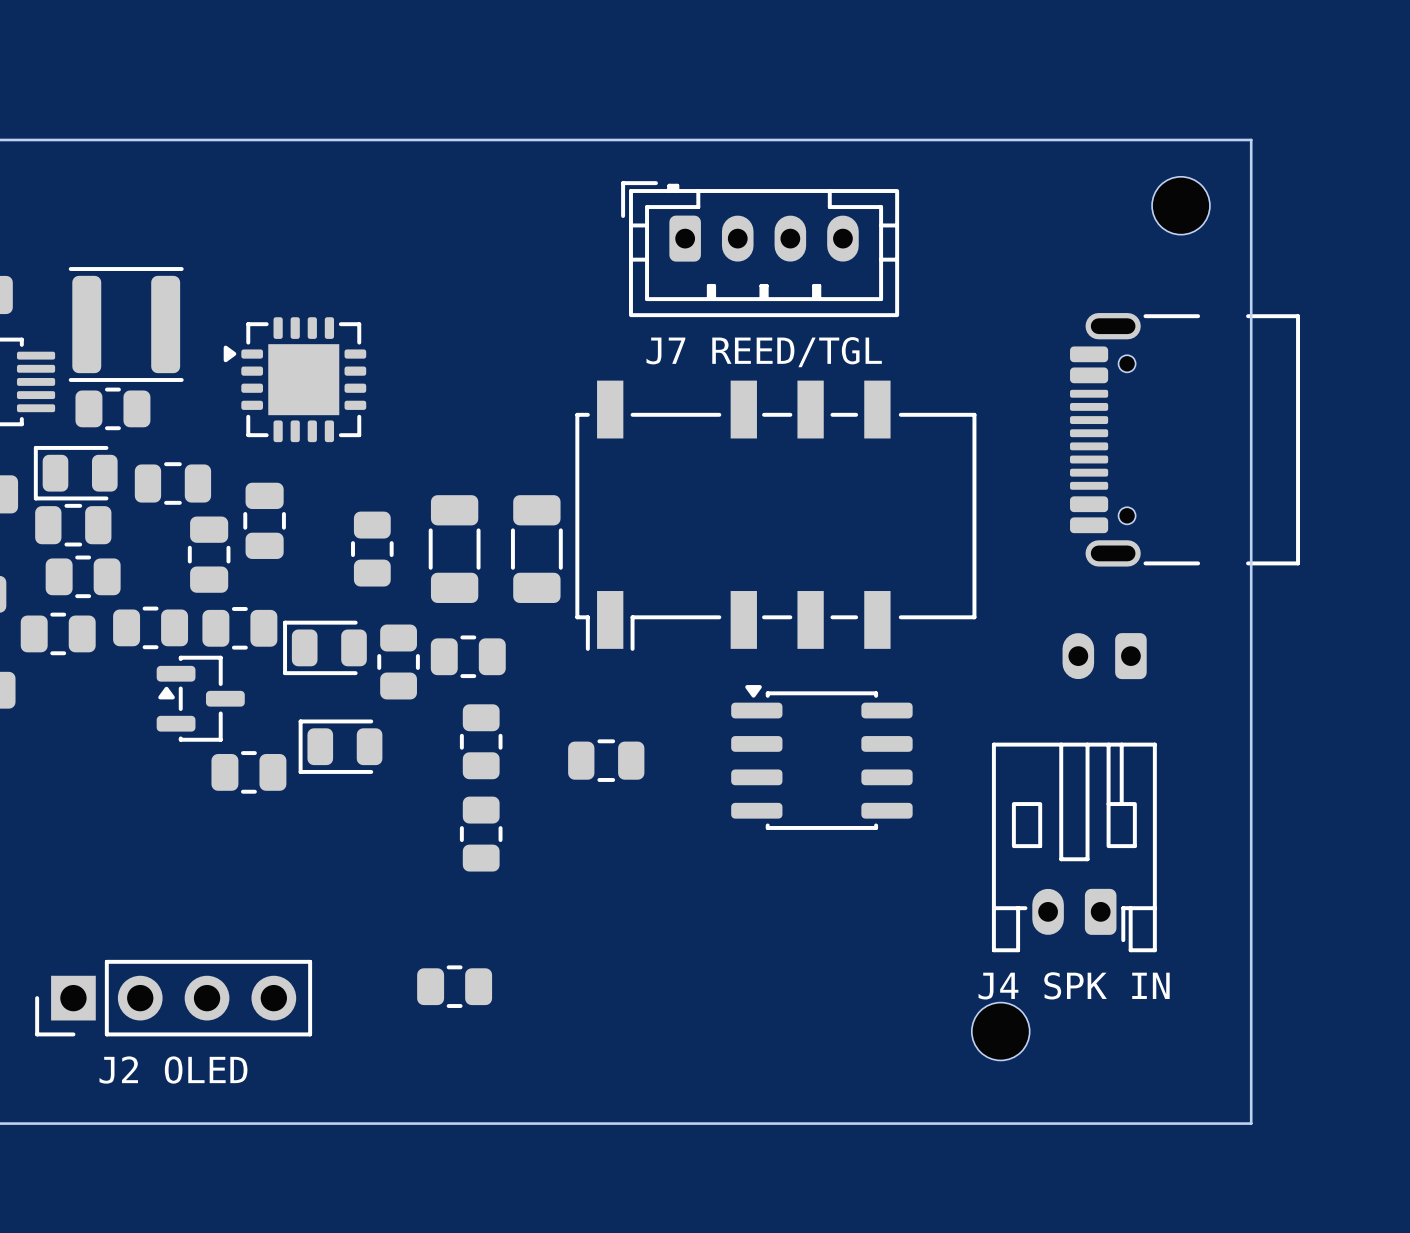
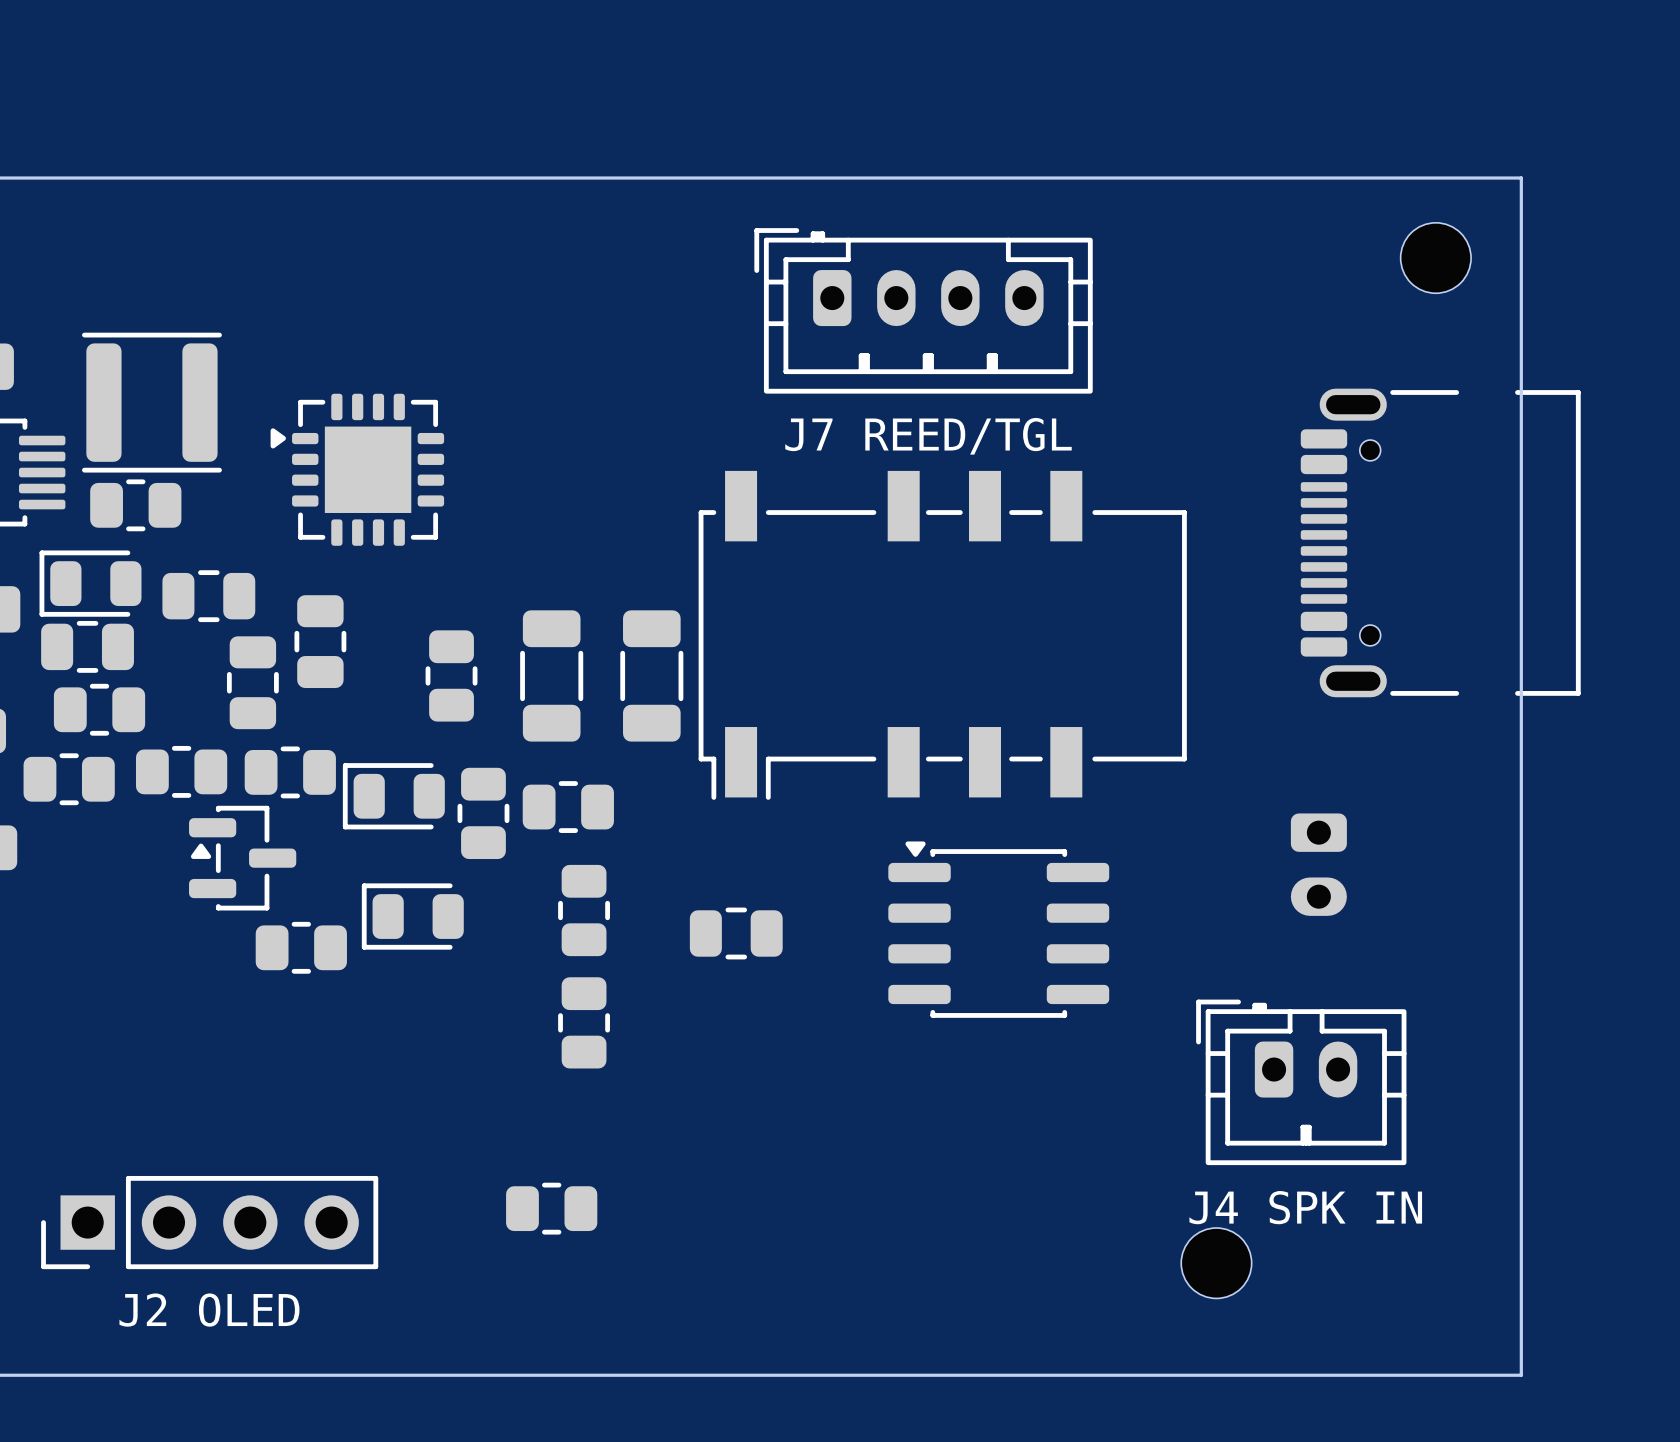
part rotation: 0° (1104, 656) -> 90° counterclockwise (1318, 864)
part position: (1104, 656) -> (1318, 864)
part: (1074, 847) -> none
part: none -> (1301, 1082)

